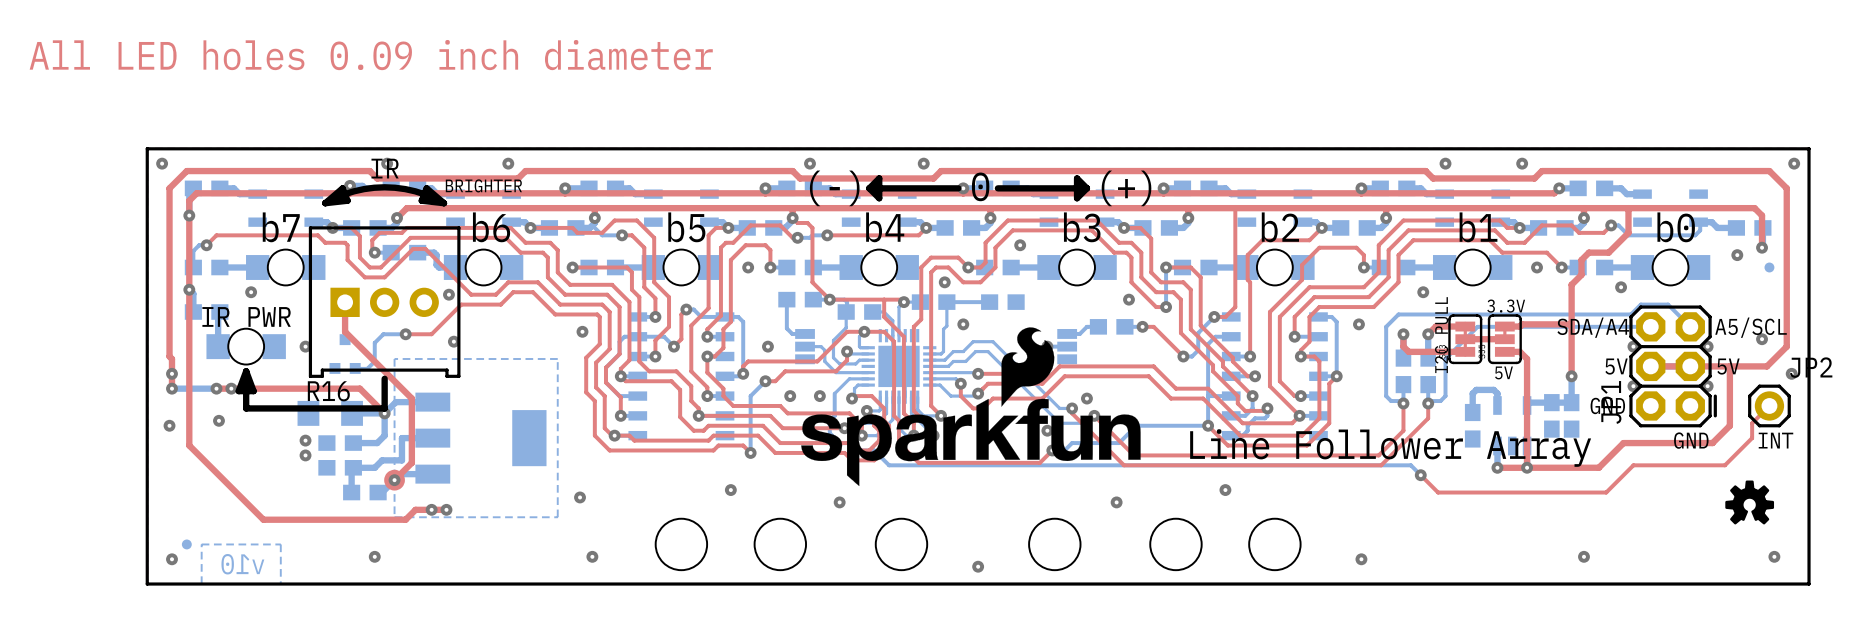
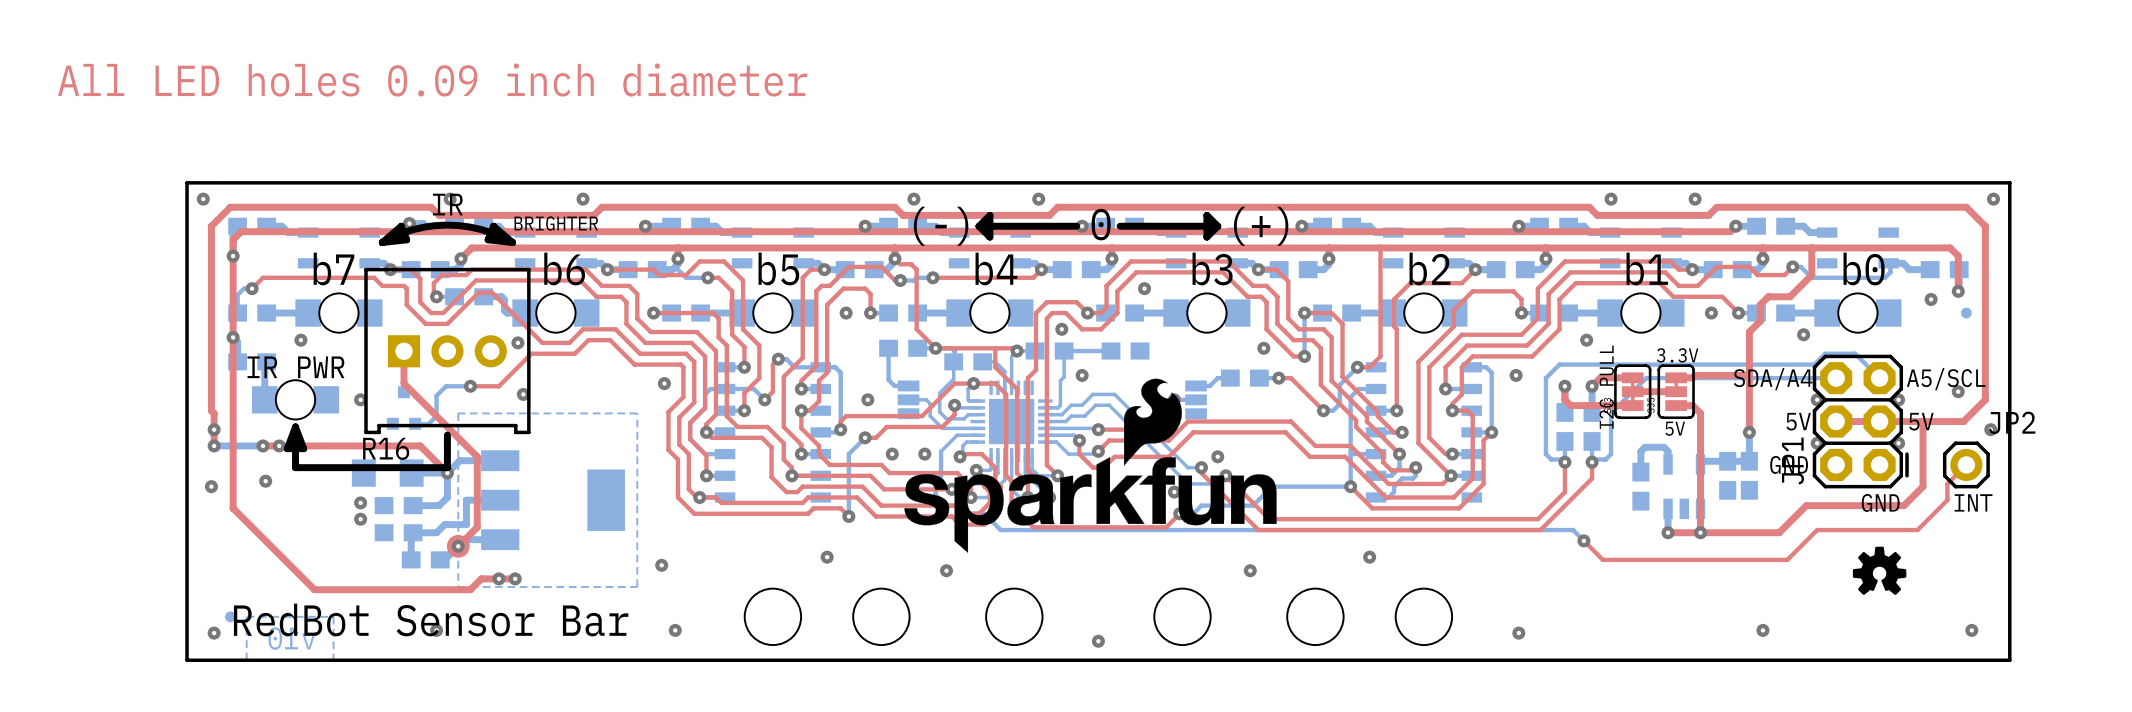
text: Line Follower Array (1390, 448) -> none
drawing position: (1749, 502) -> (1879, 570)
text: none -> RedBot Sensor Bar (431, 619)

